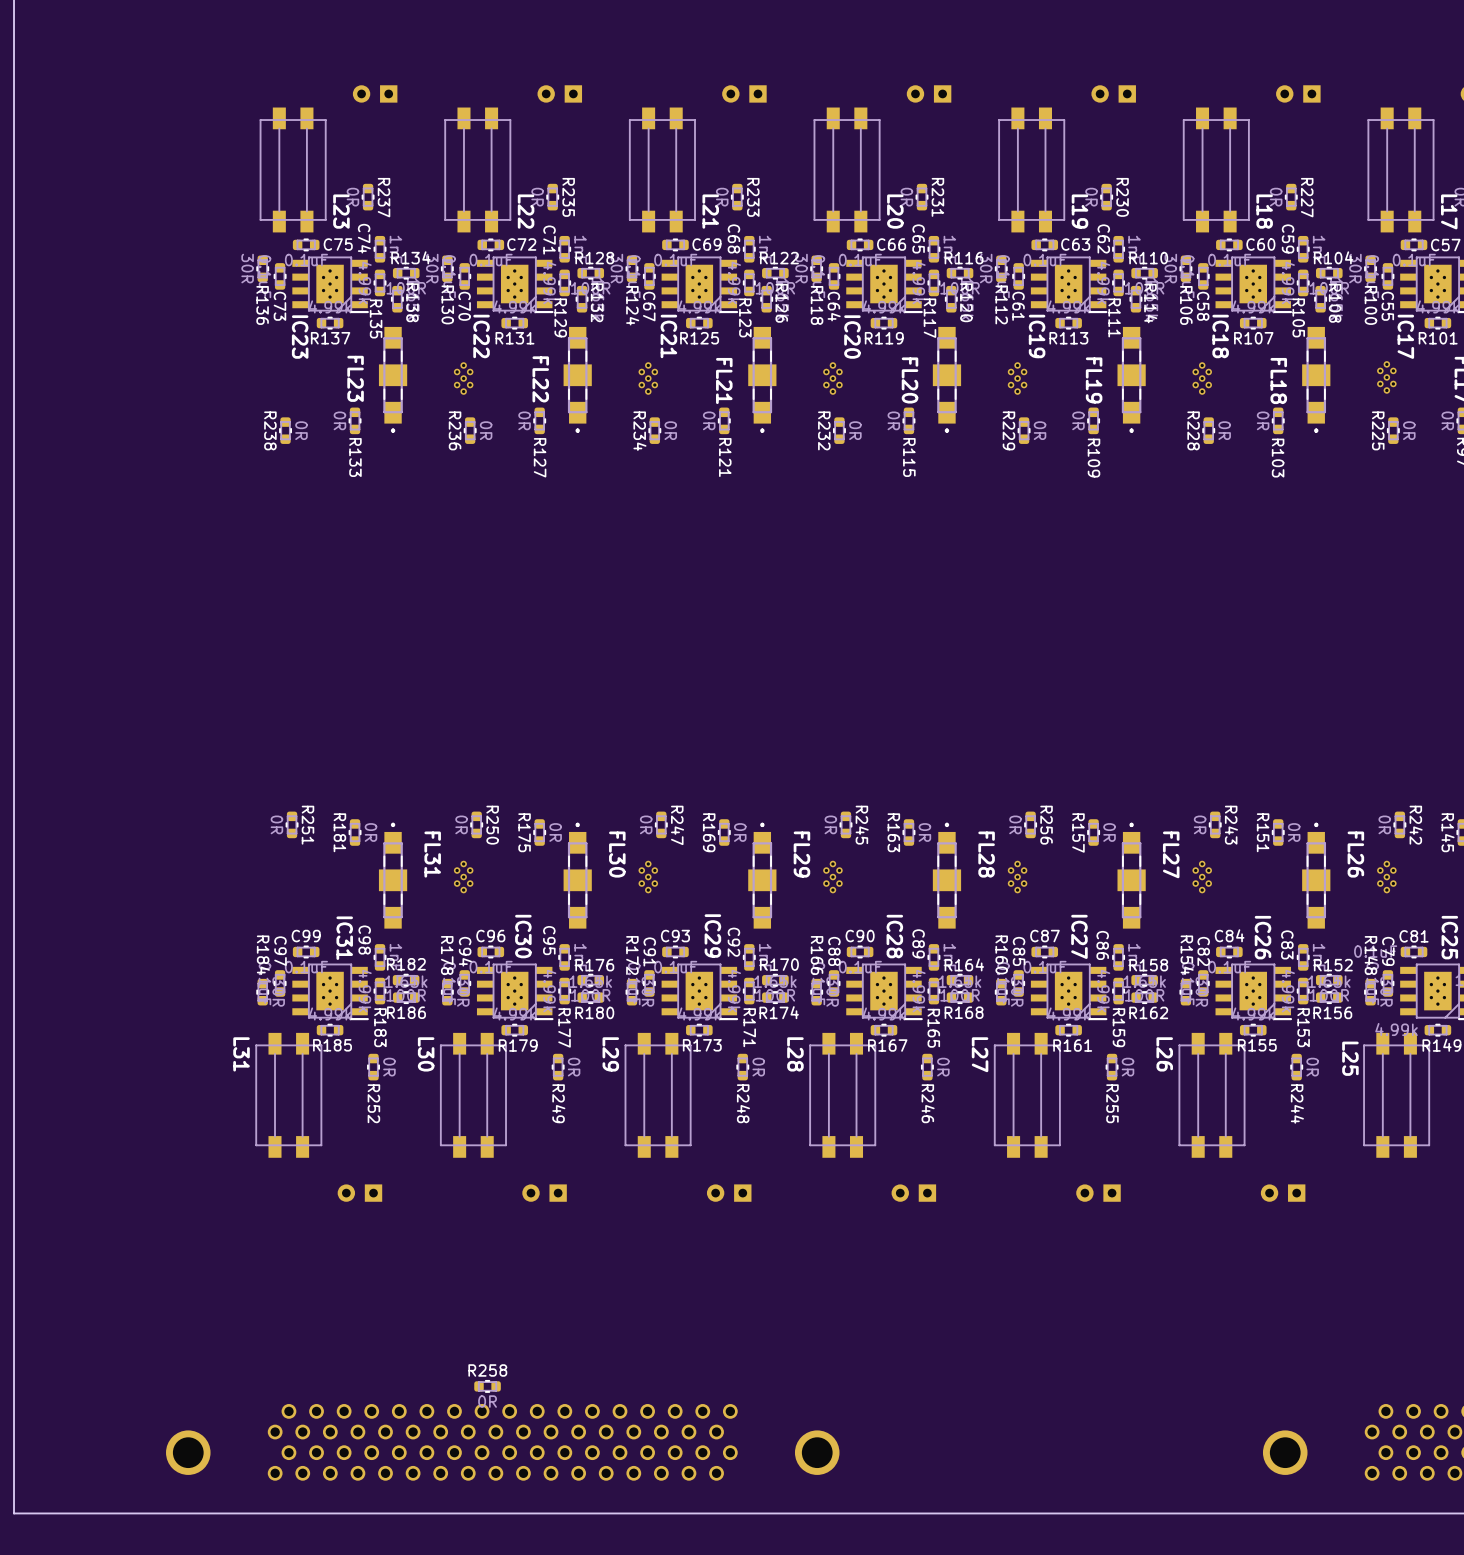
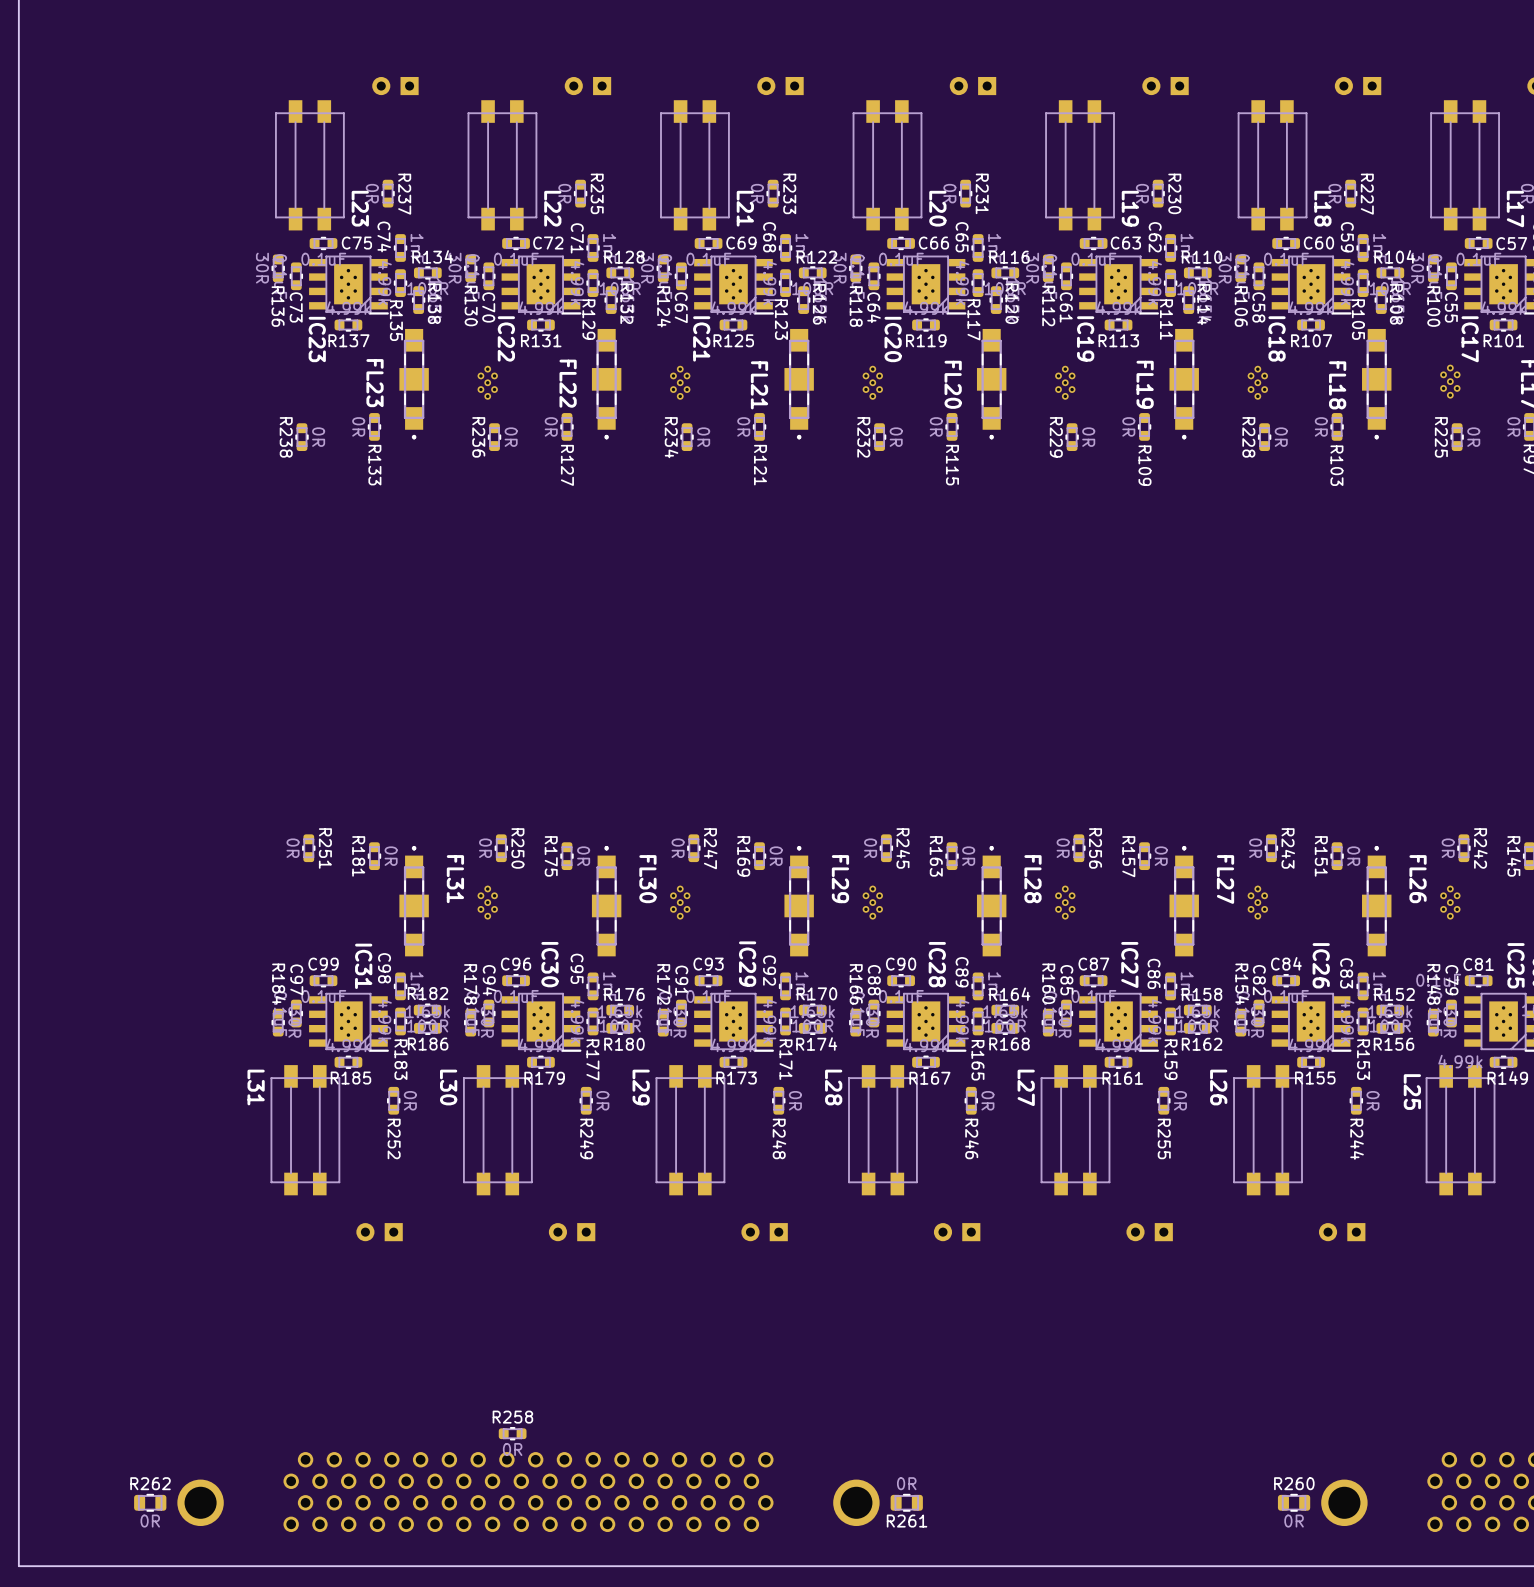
R262: none -> 0R (150, 1502)
R261: none -> 0R (906, 1502)
R260: none -> 0R (1294, 1502)

